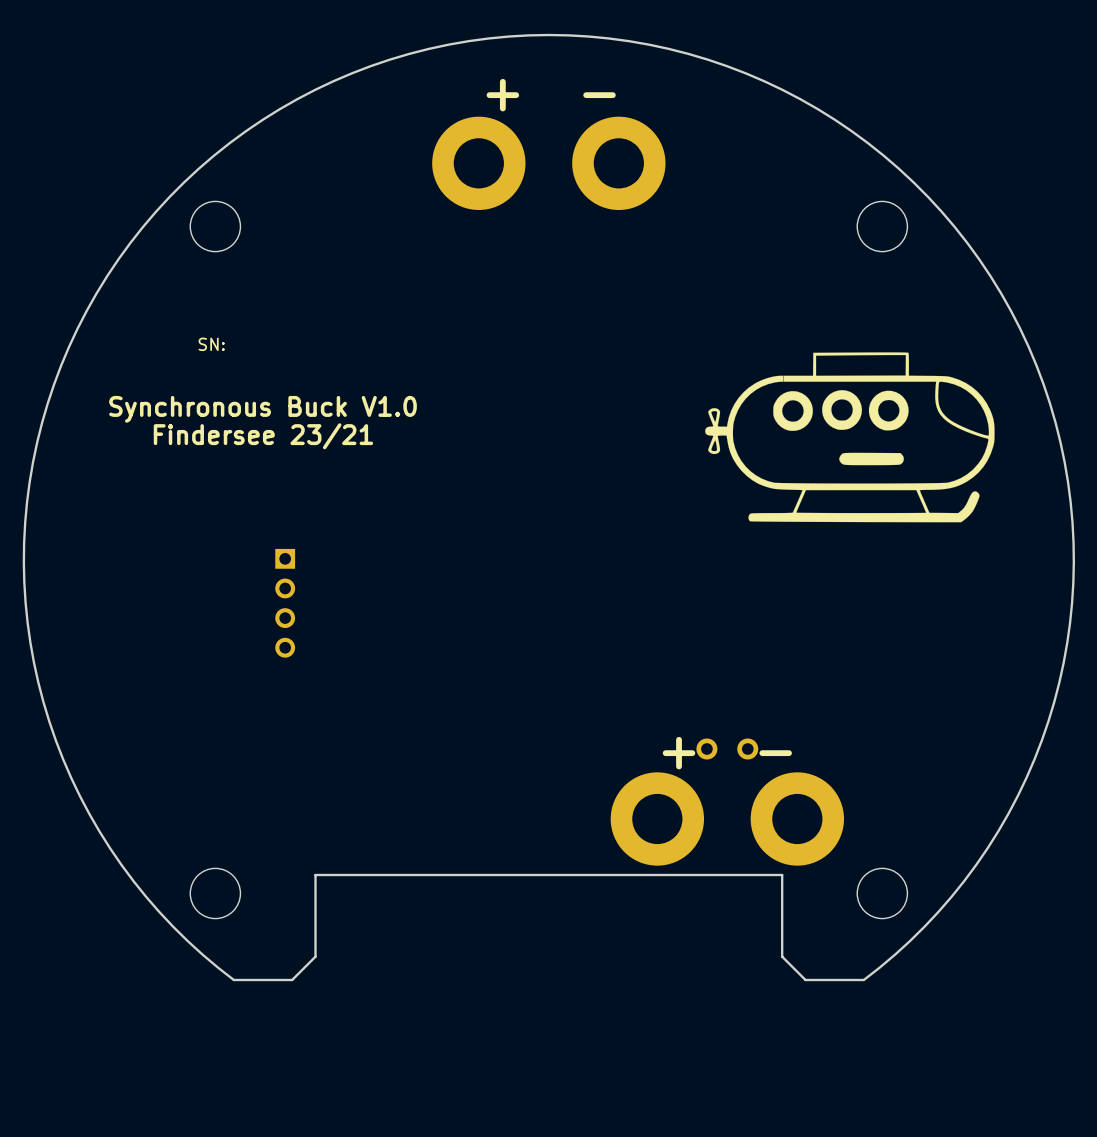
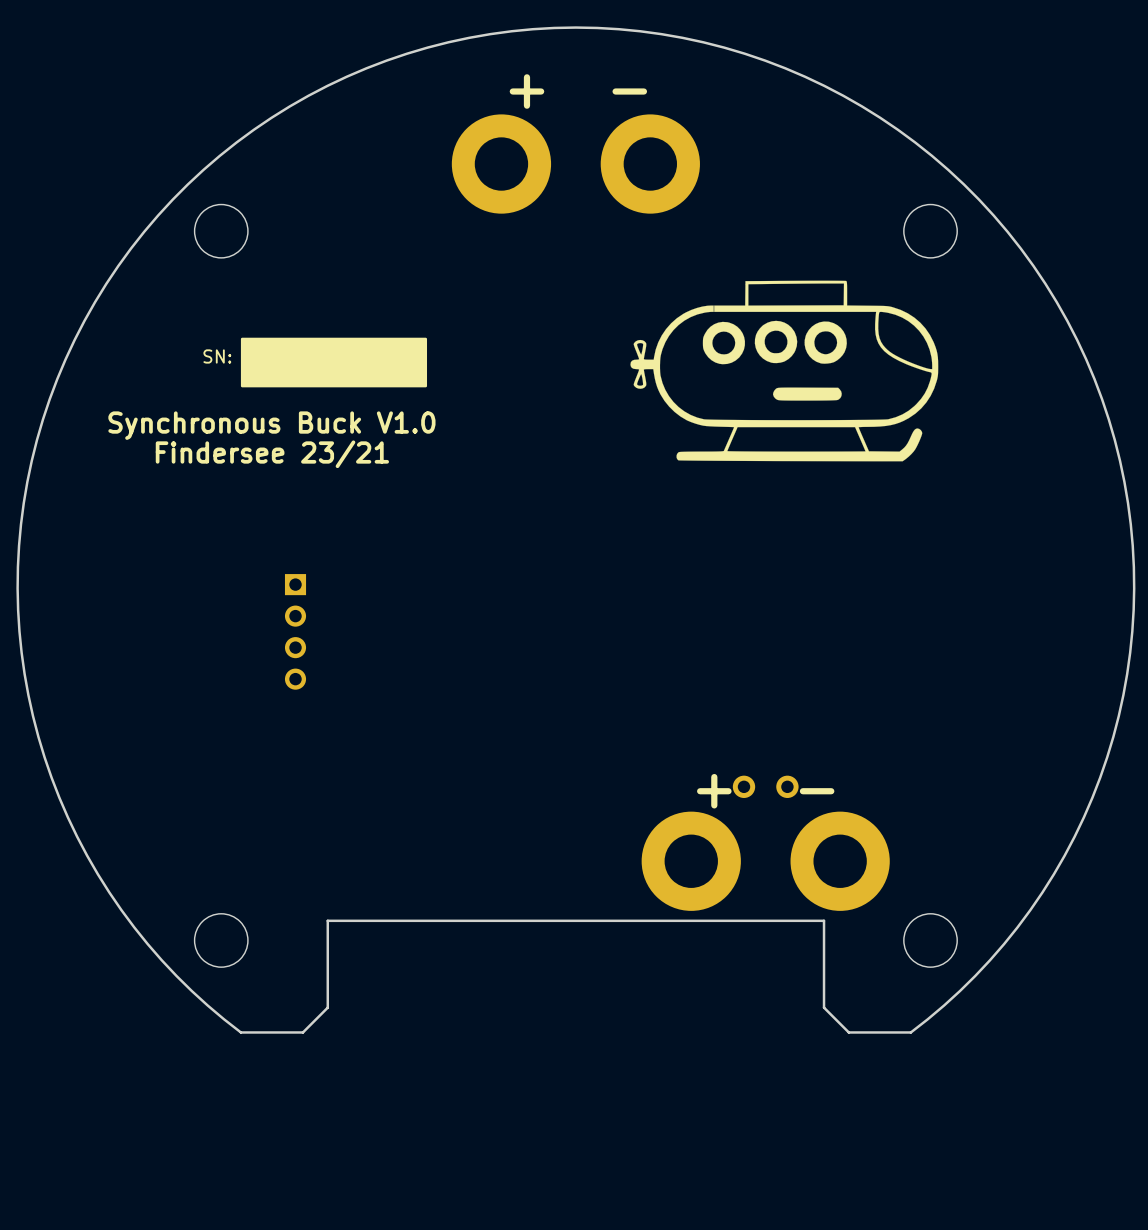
drawing: none -> [240, 337, 428, 388]
drawing position: (849, 437) -> (784, 371)

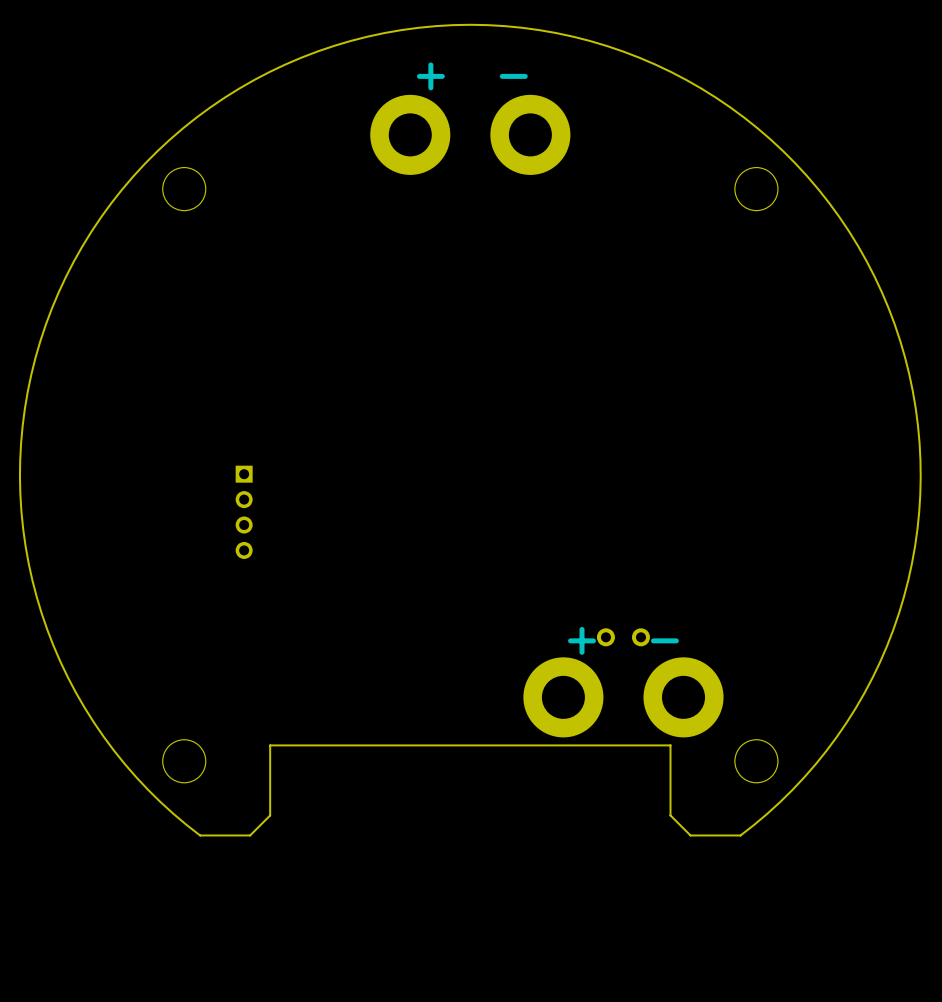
drawing: [630, 280, 939, 462] -> none
drawing: [240, 337, 428, 388] -> none
text: SN: (217, 356) -> none
text: Synchronous Buck V1.0 (271, 425) -> none
text: Findersee 23/21 (272, 454) -> none

